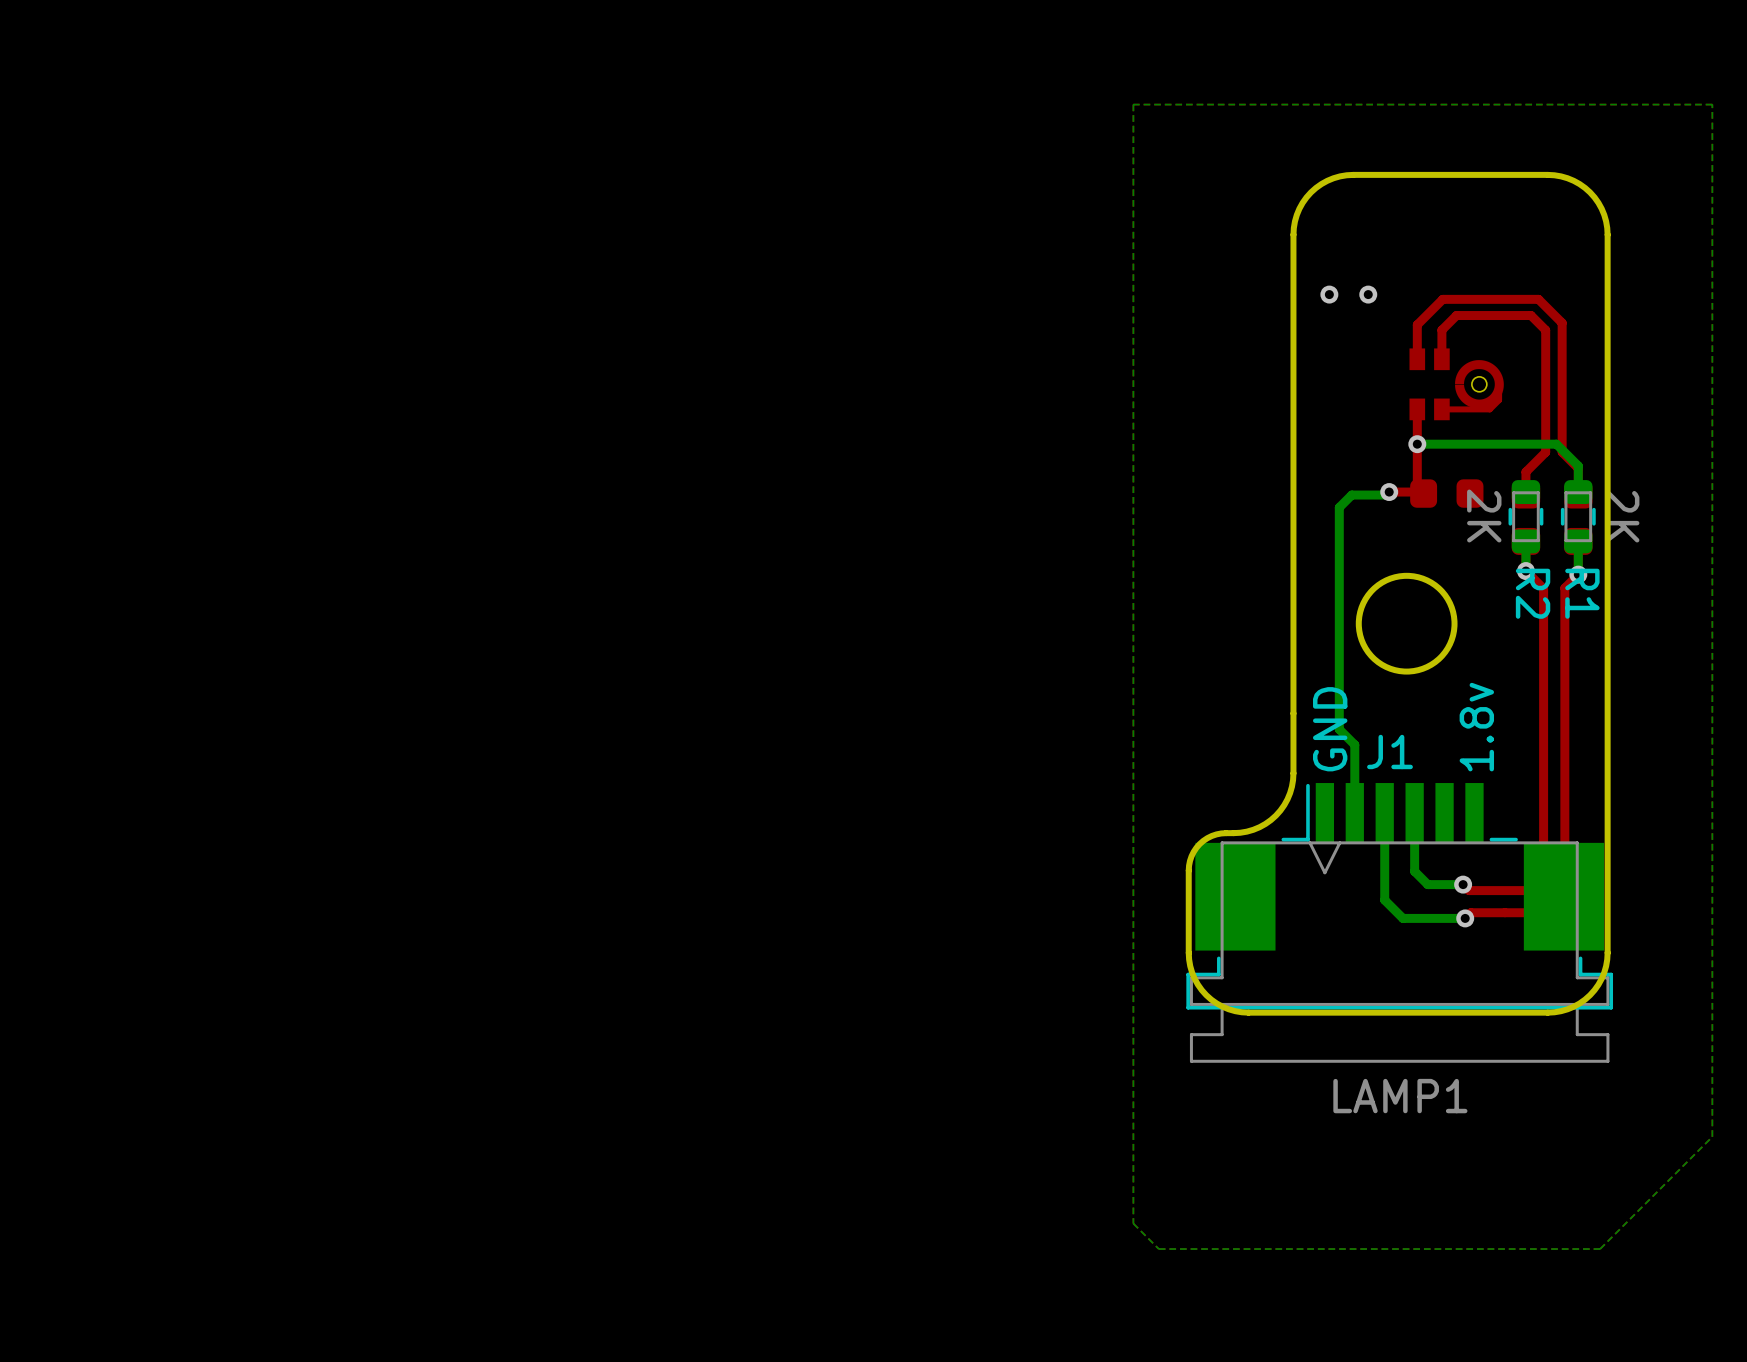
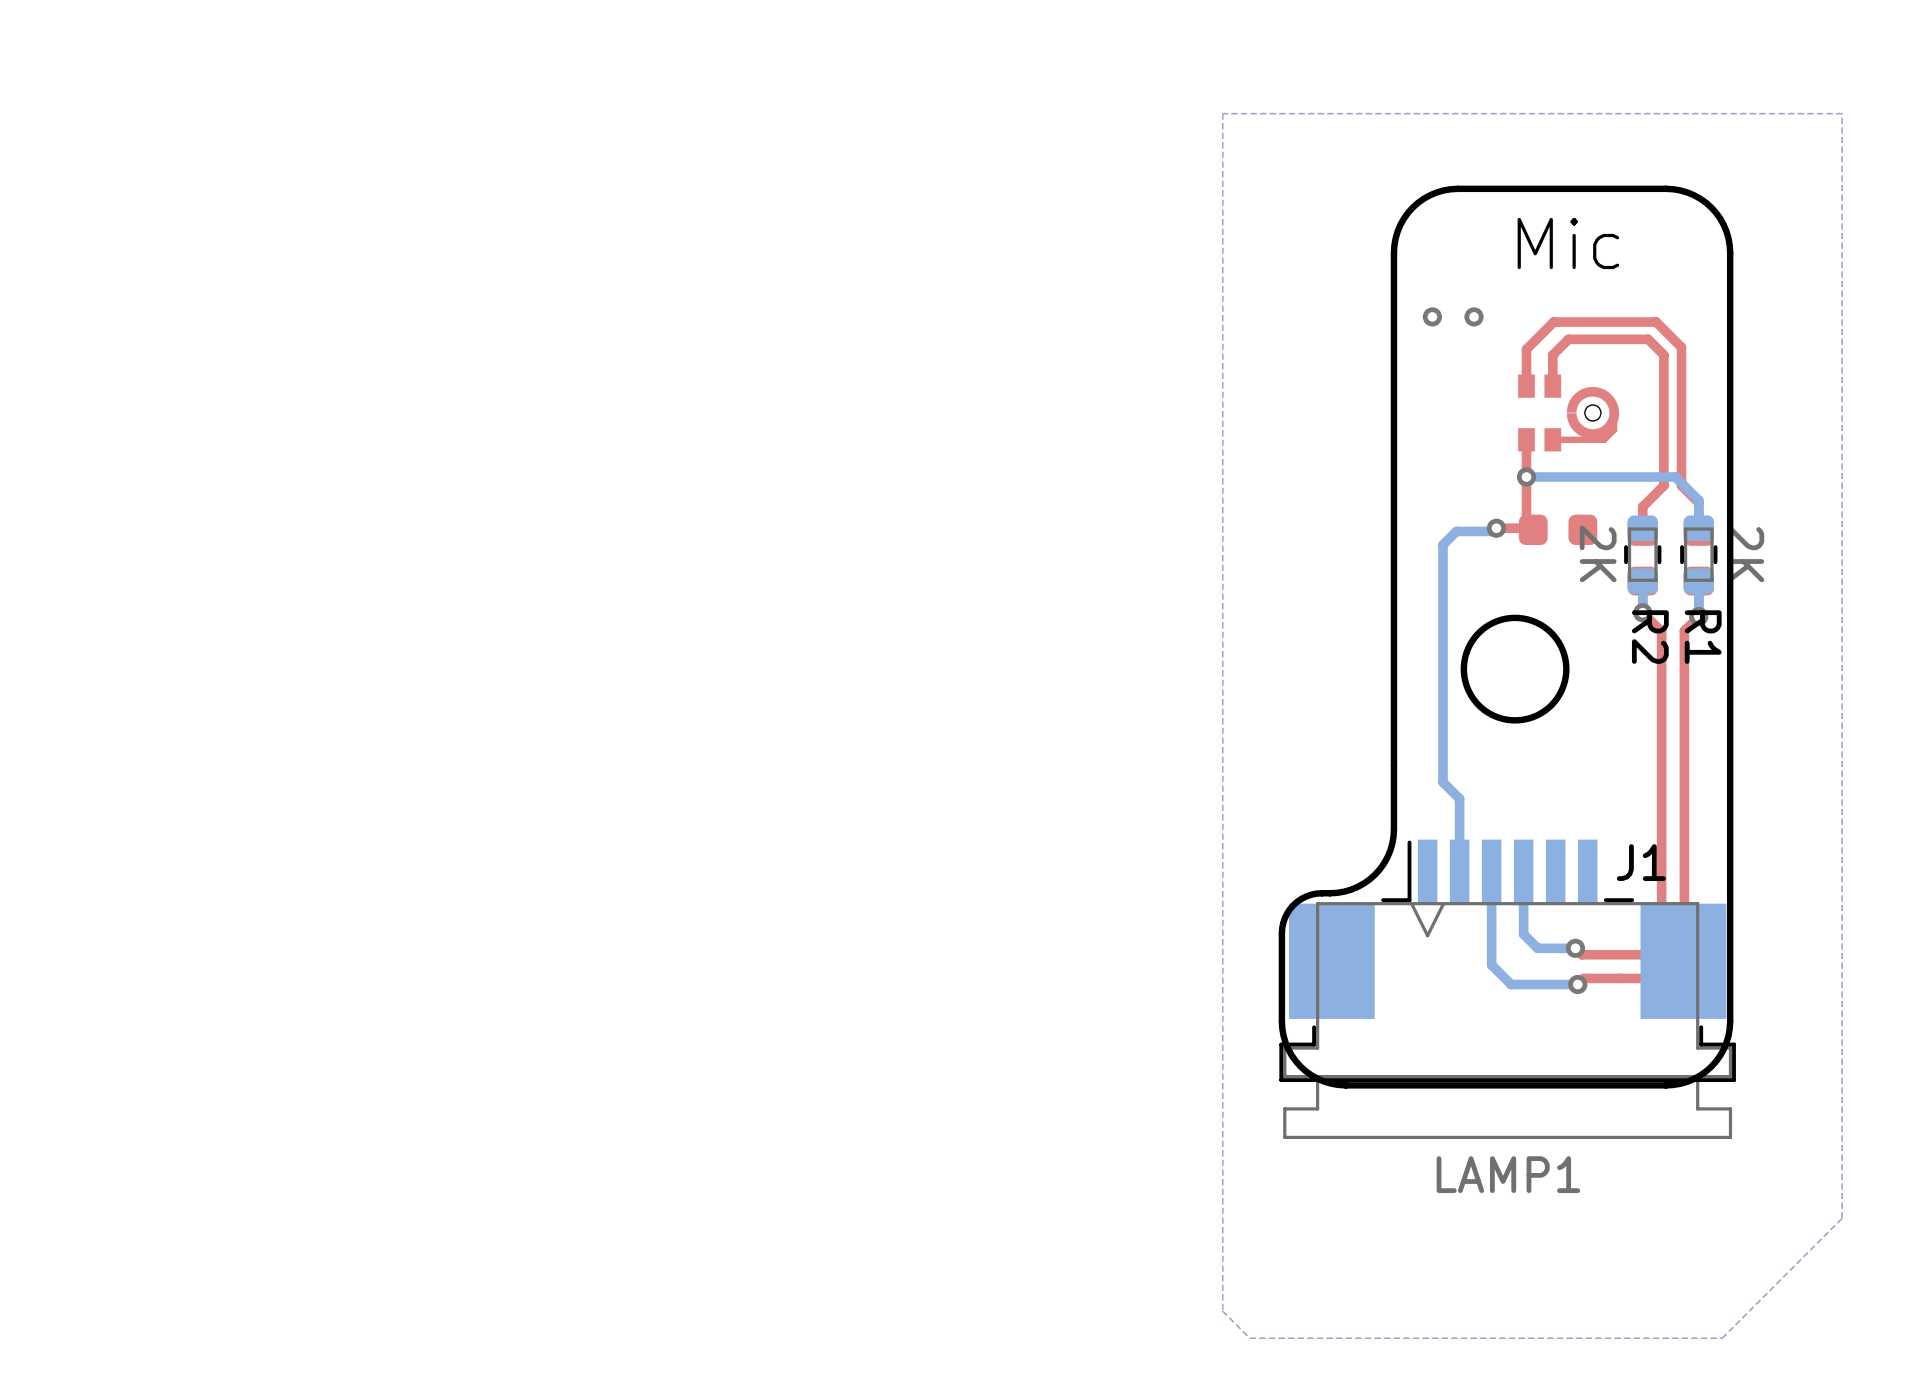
text: none -> Mic (1568, 243)
text: 1.8v (1476, 727) -> none
text: GND (1330, 729) -> none
J1 name position: J1 (1389, 751) -> J1 (1641, 862)

